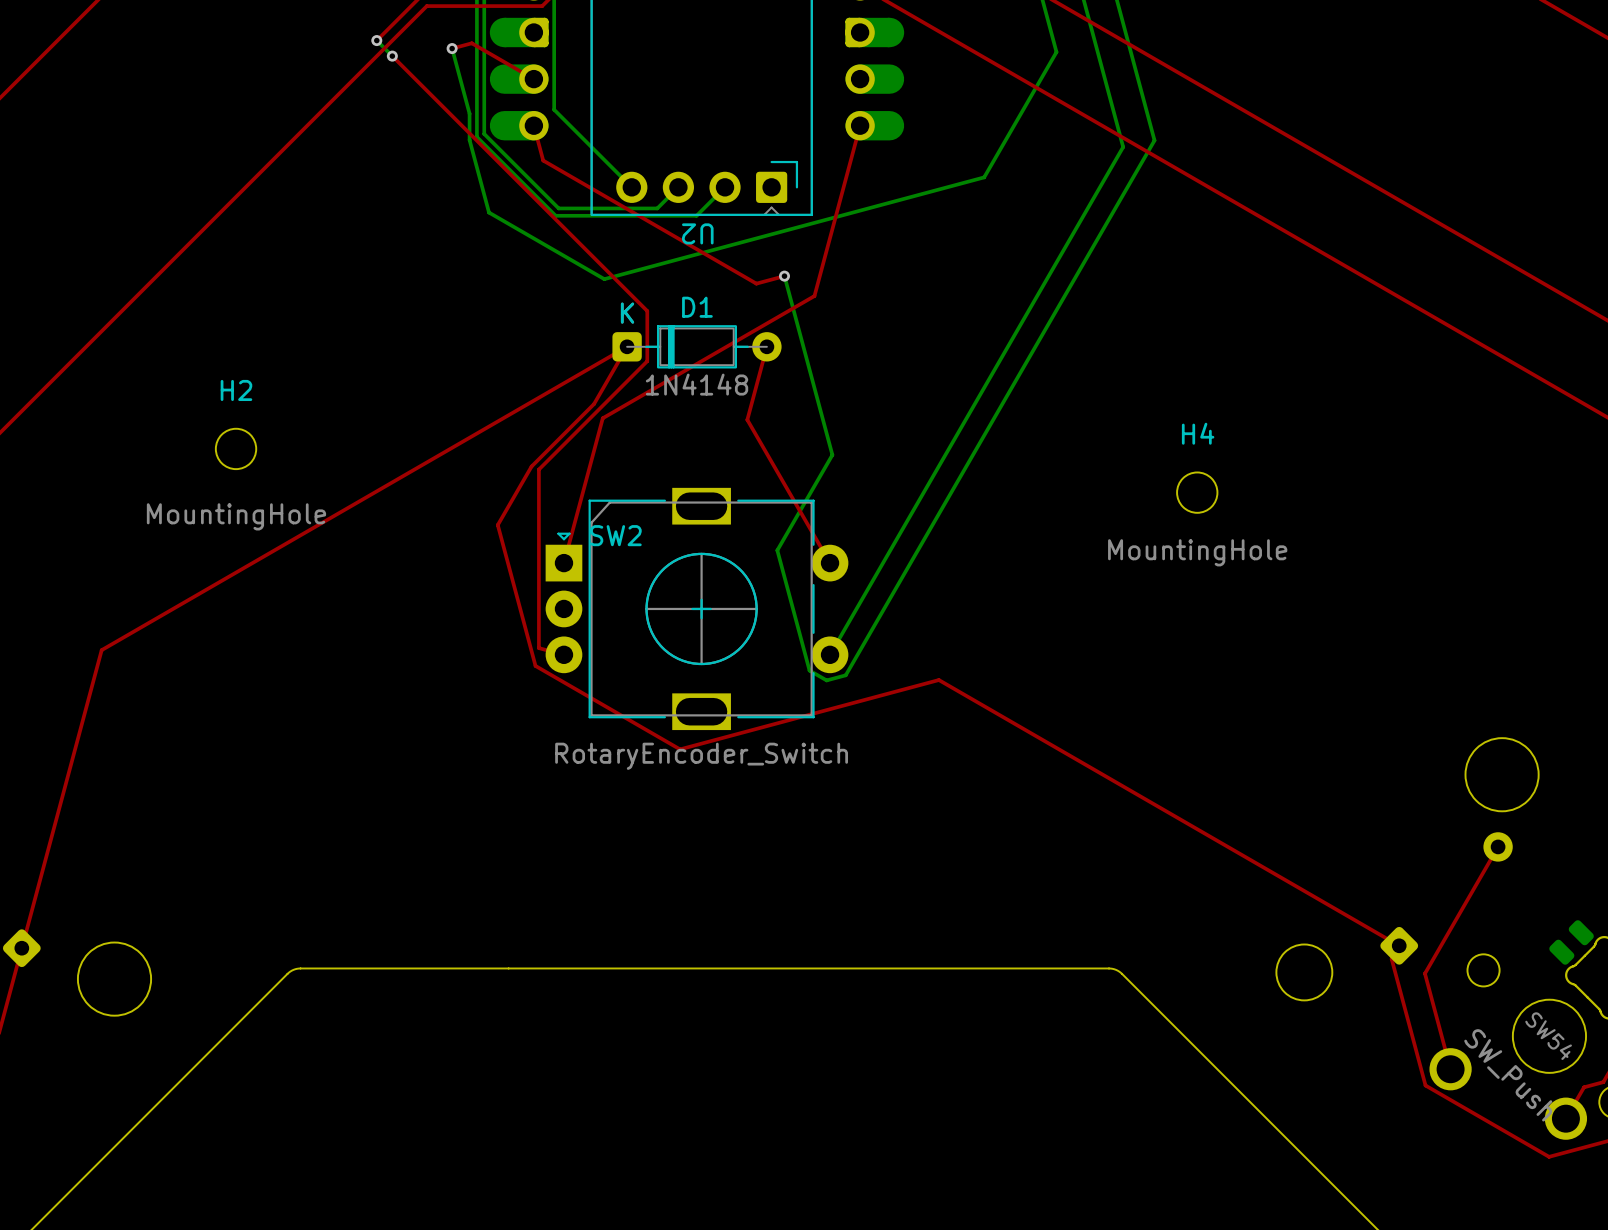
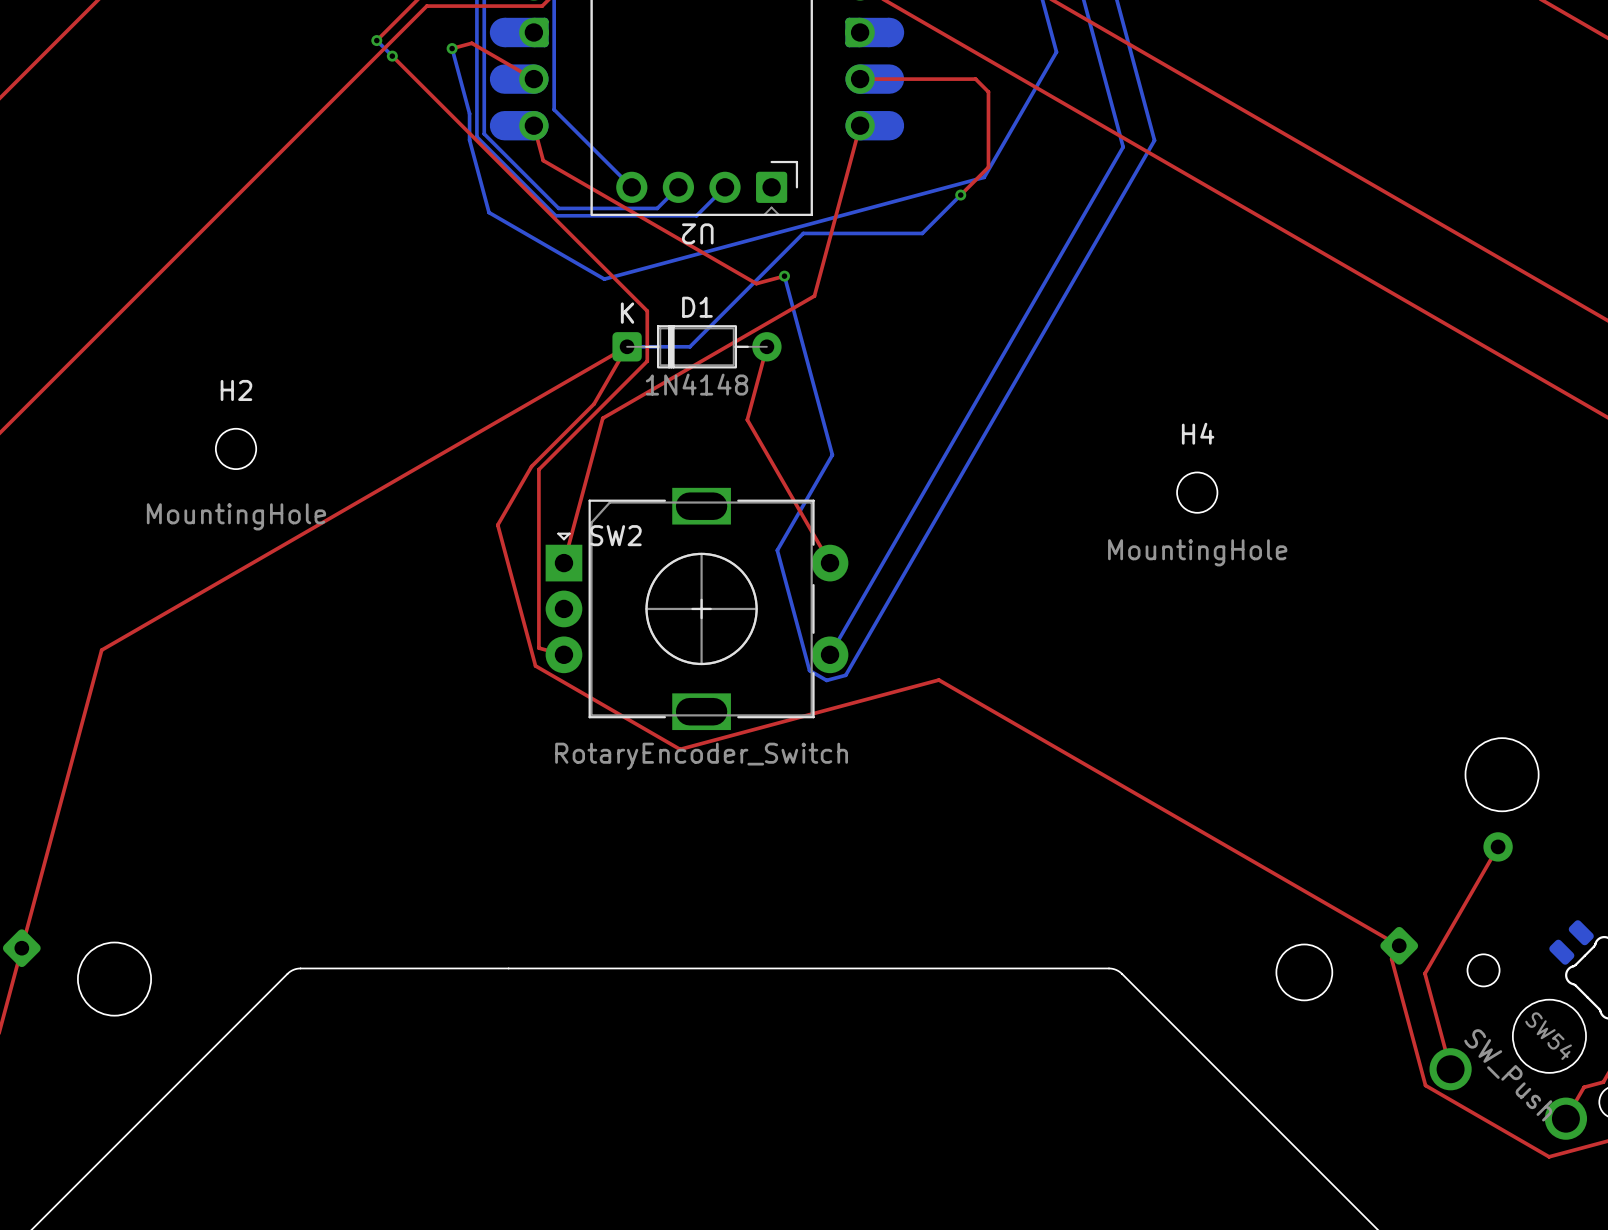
top track: none -> (860, 79) (975, 79) (988, 91) (988, 167) (960, 195)
bottom track: none -> (960, 195) (922, 233) (803, 233) (689, 346) (627, 346)
via: none -> (960, 195)

